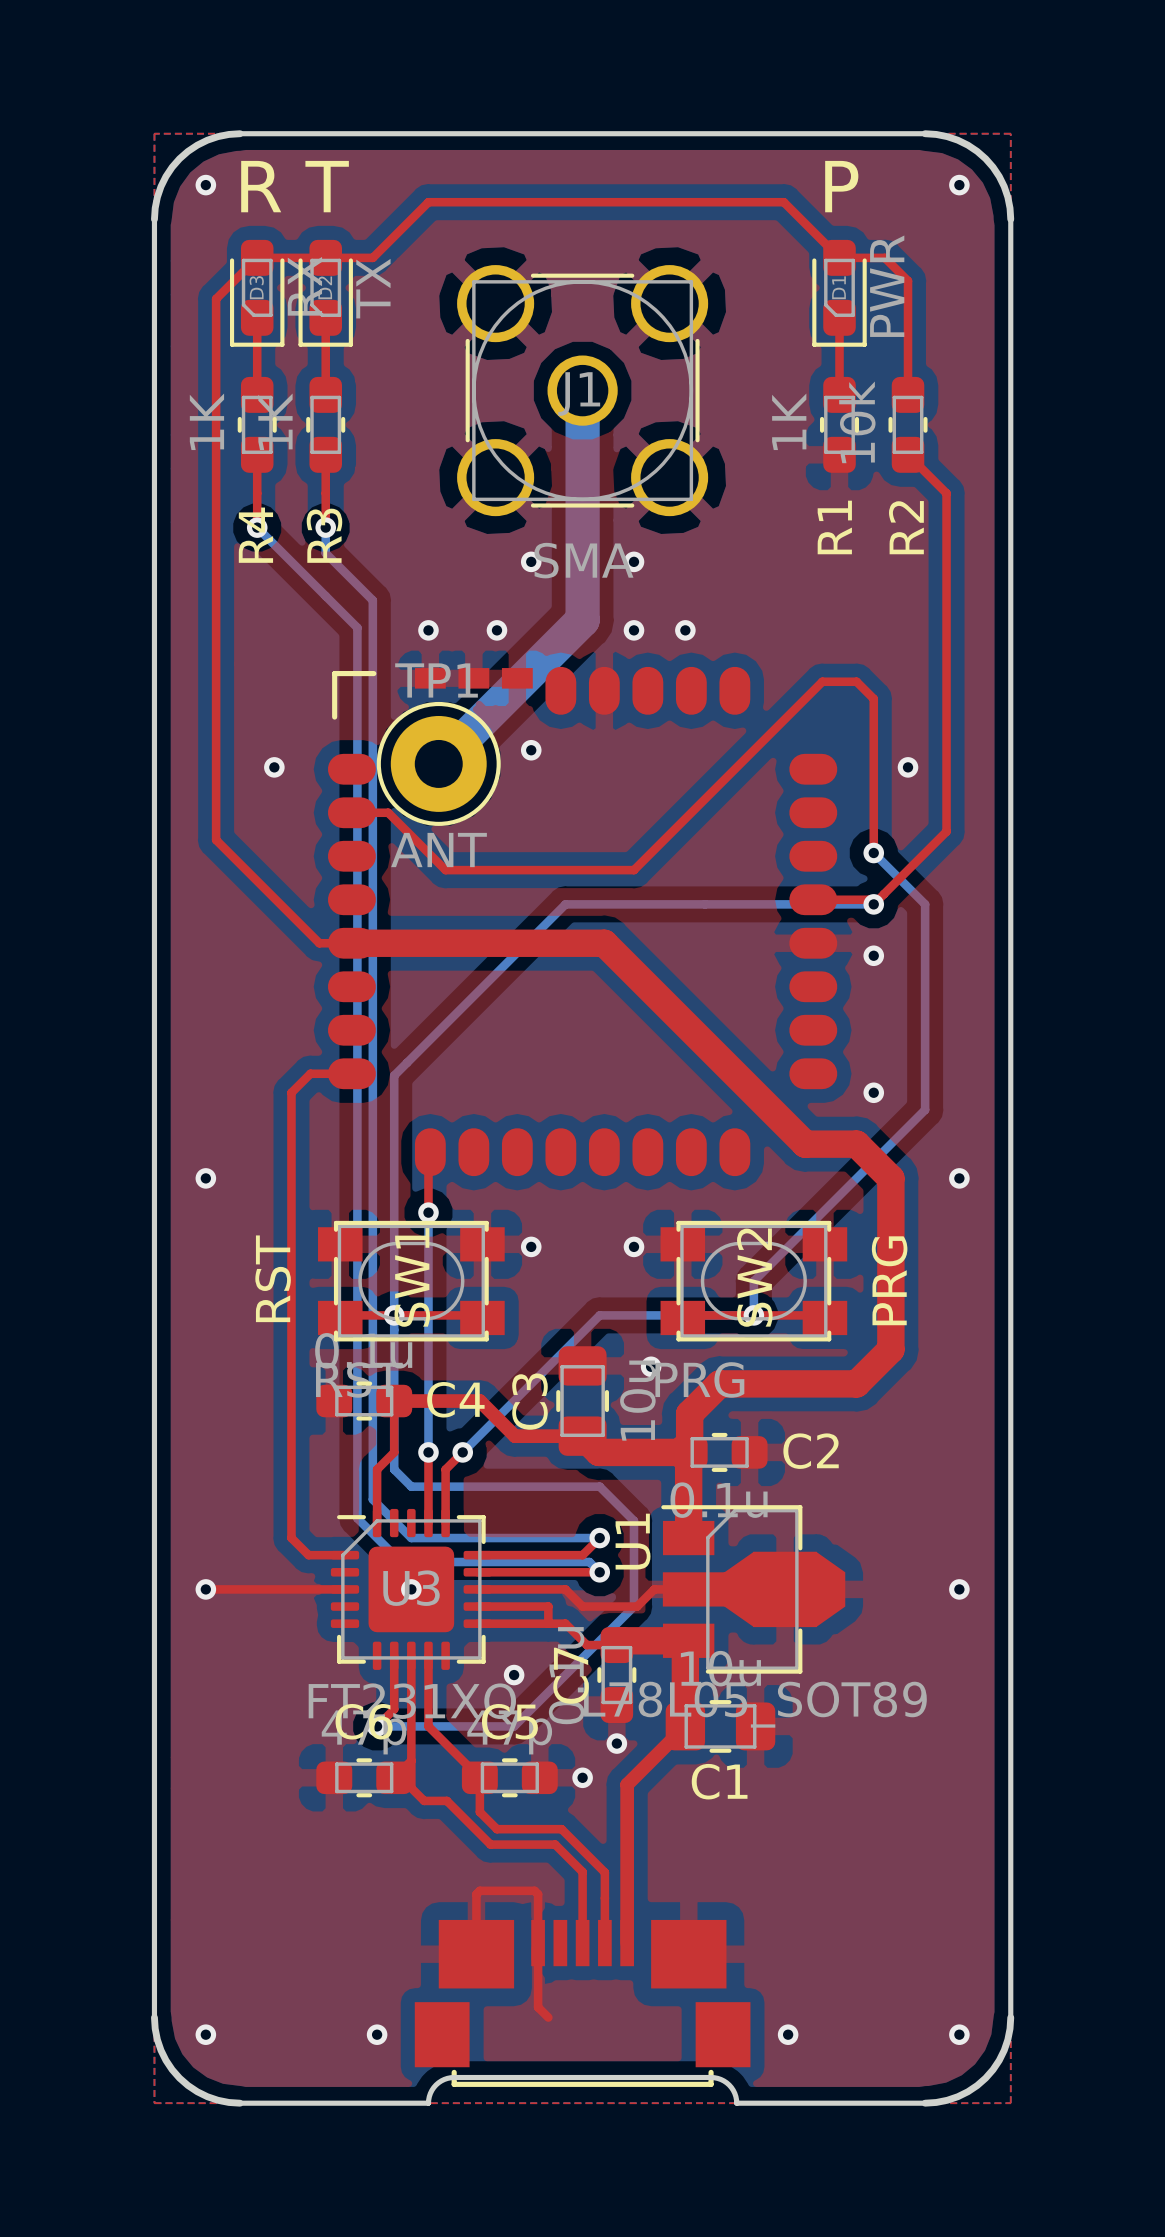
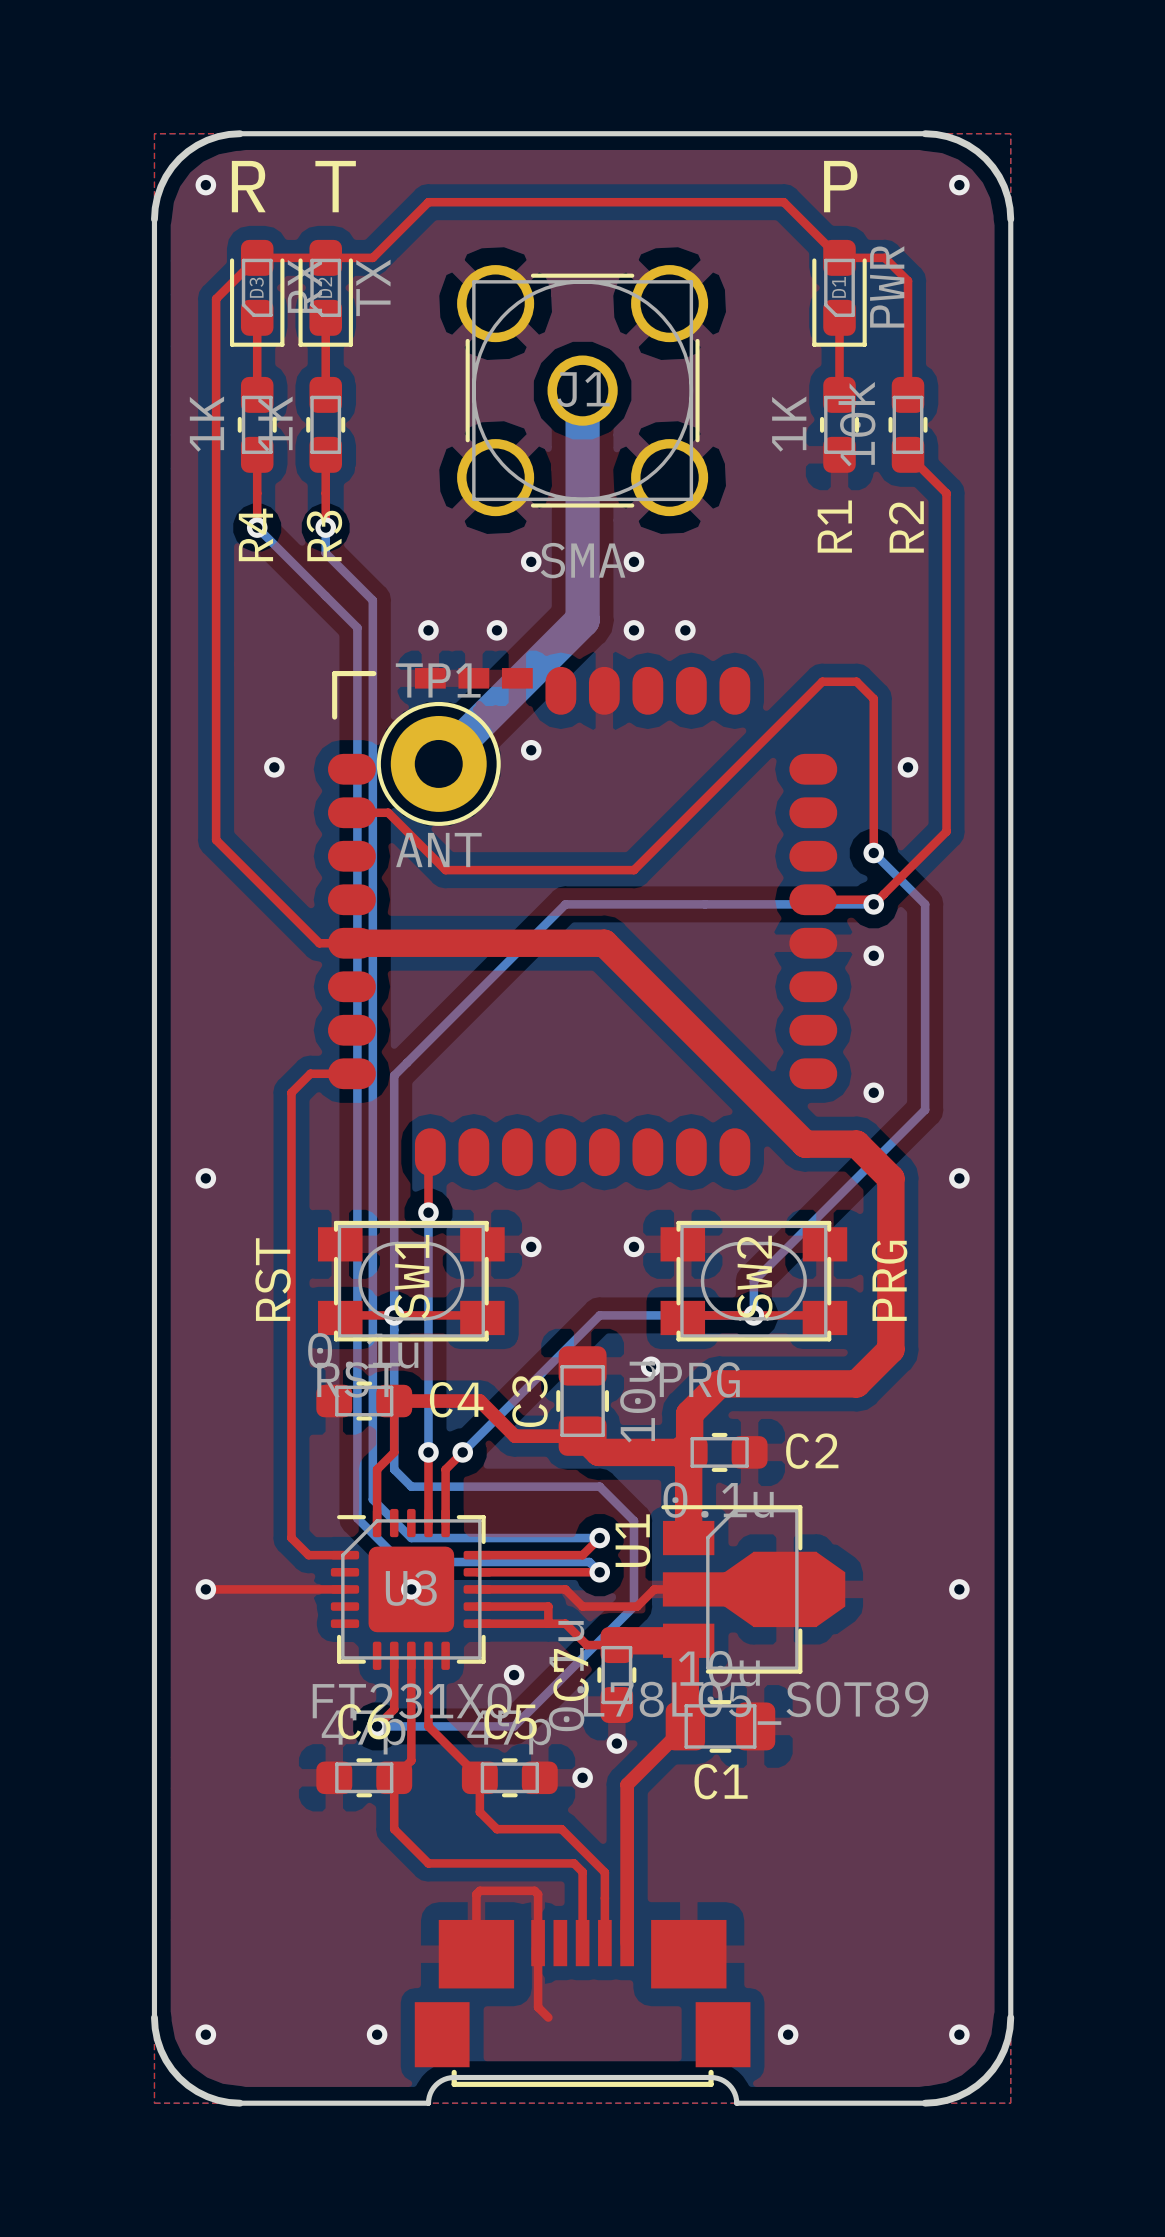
top track: (411, 1760) (411, 1788) (424, 1800) (446, 1800) (490, 1844) (555, 1844) (574, 1863) -> (394, 1777) (394, 1829) (428, 1863) (574, 1863)

